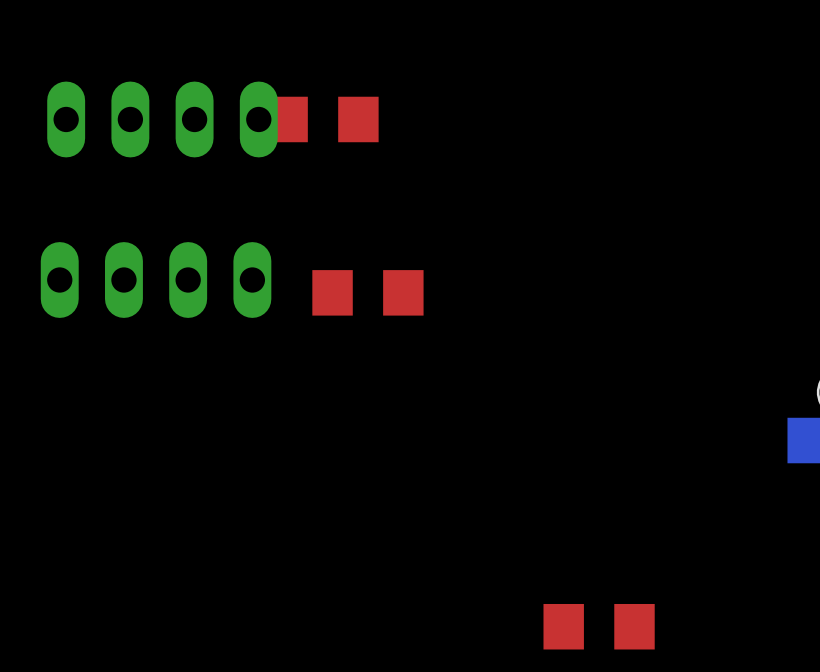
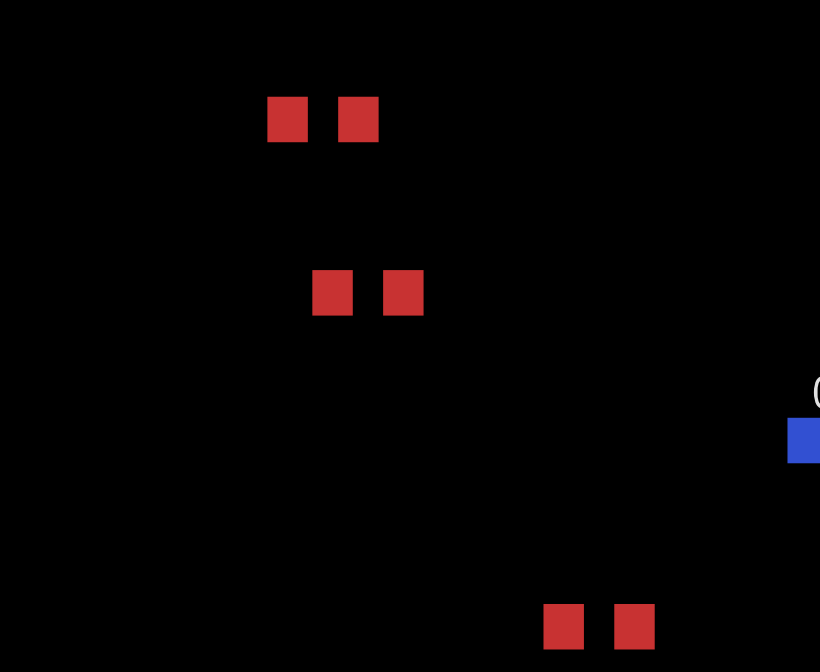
part: (162, 119) -> none
part: (156, 280) -> none

